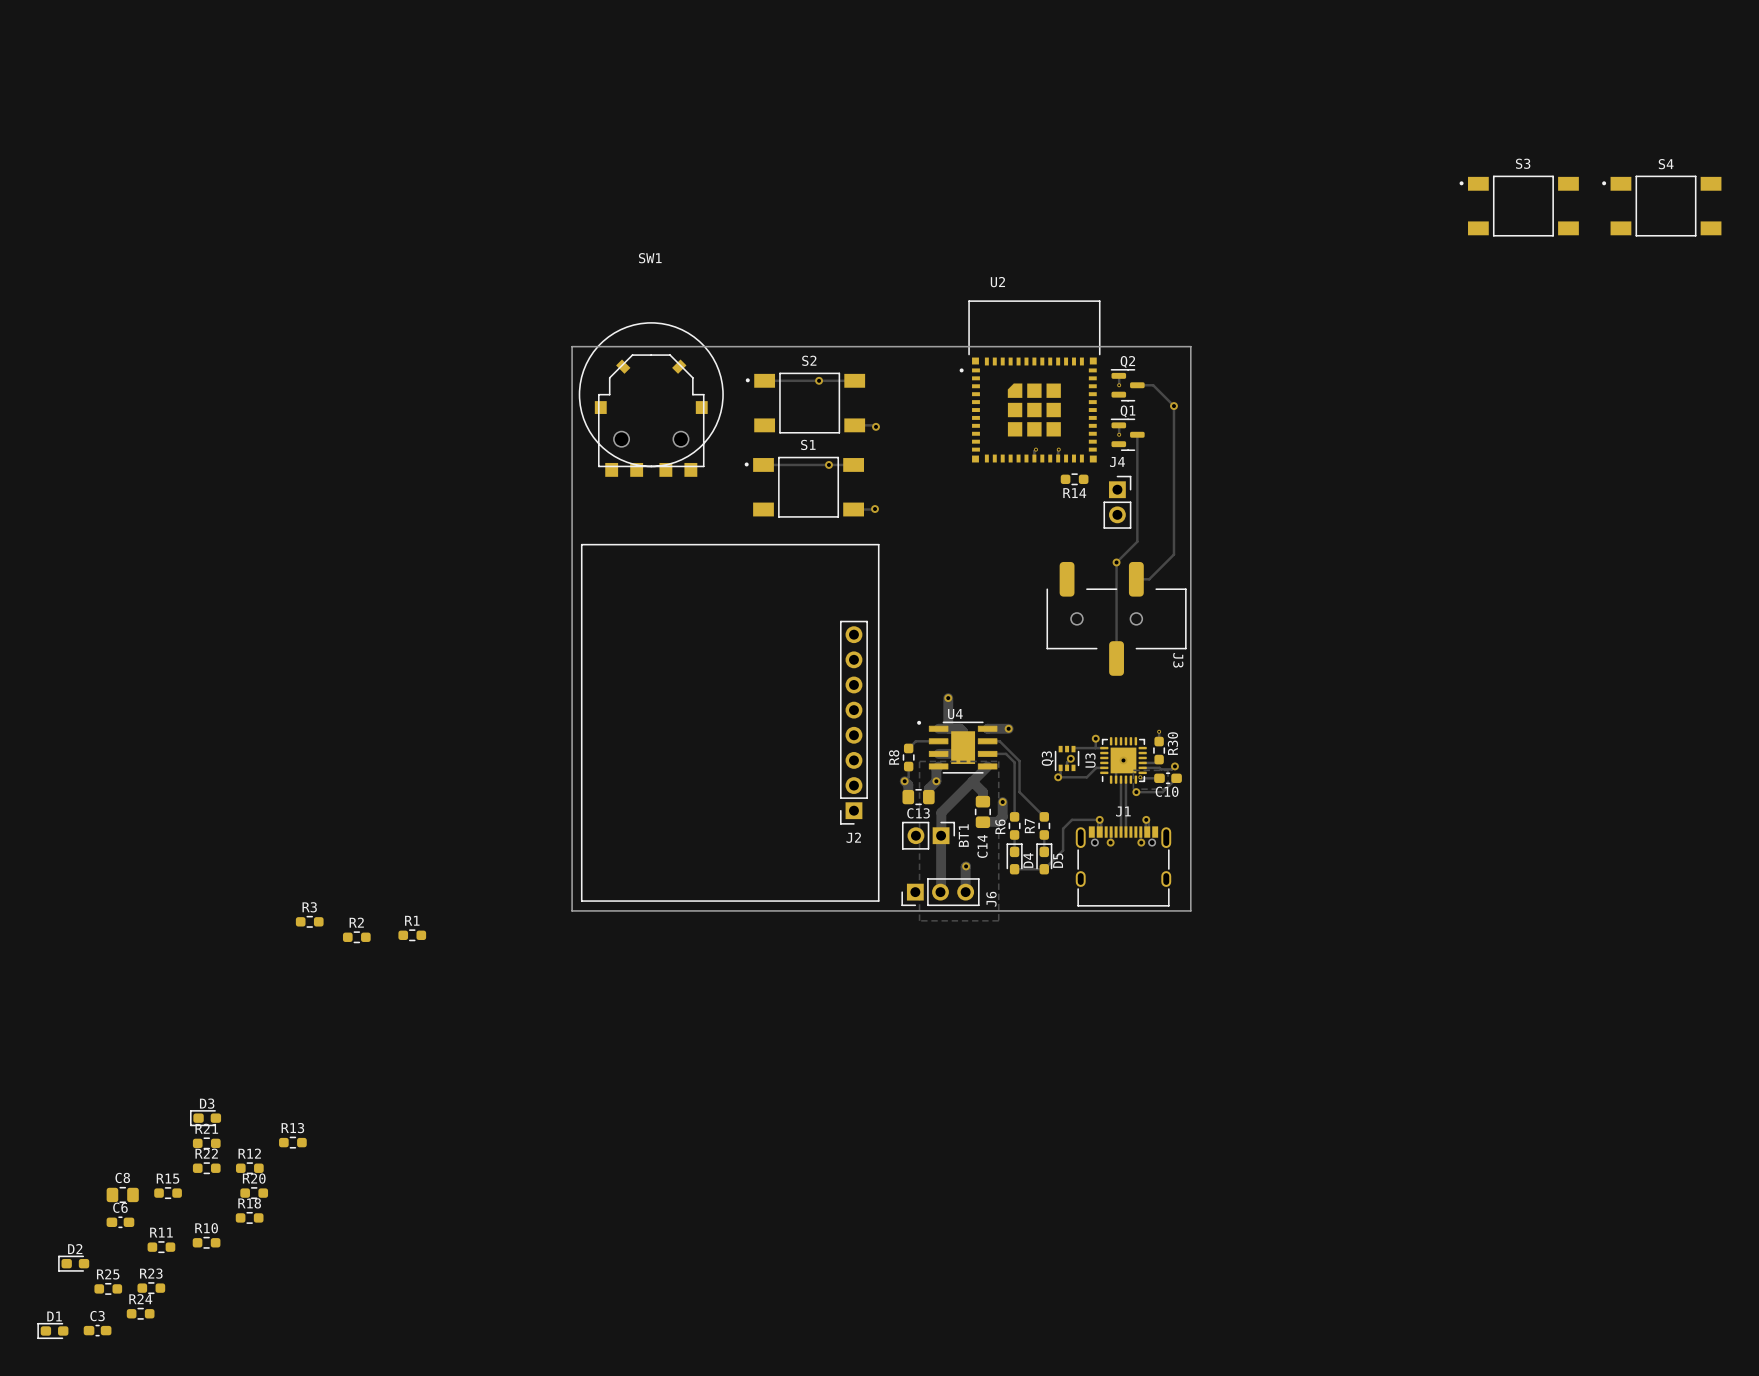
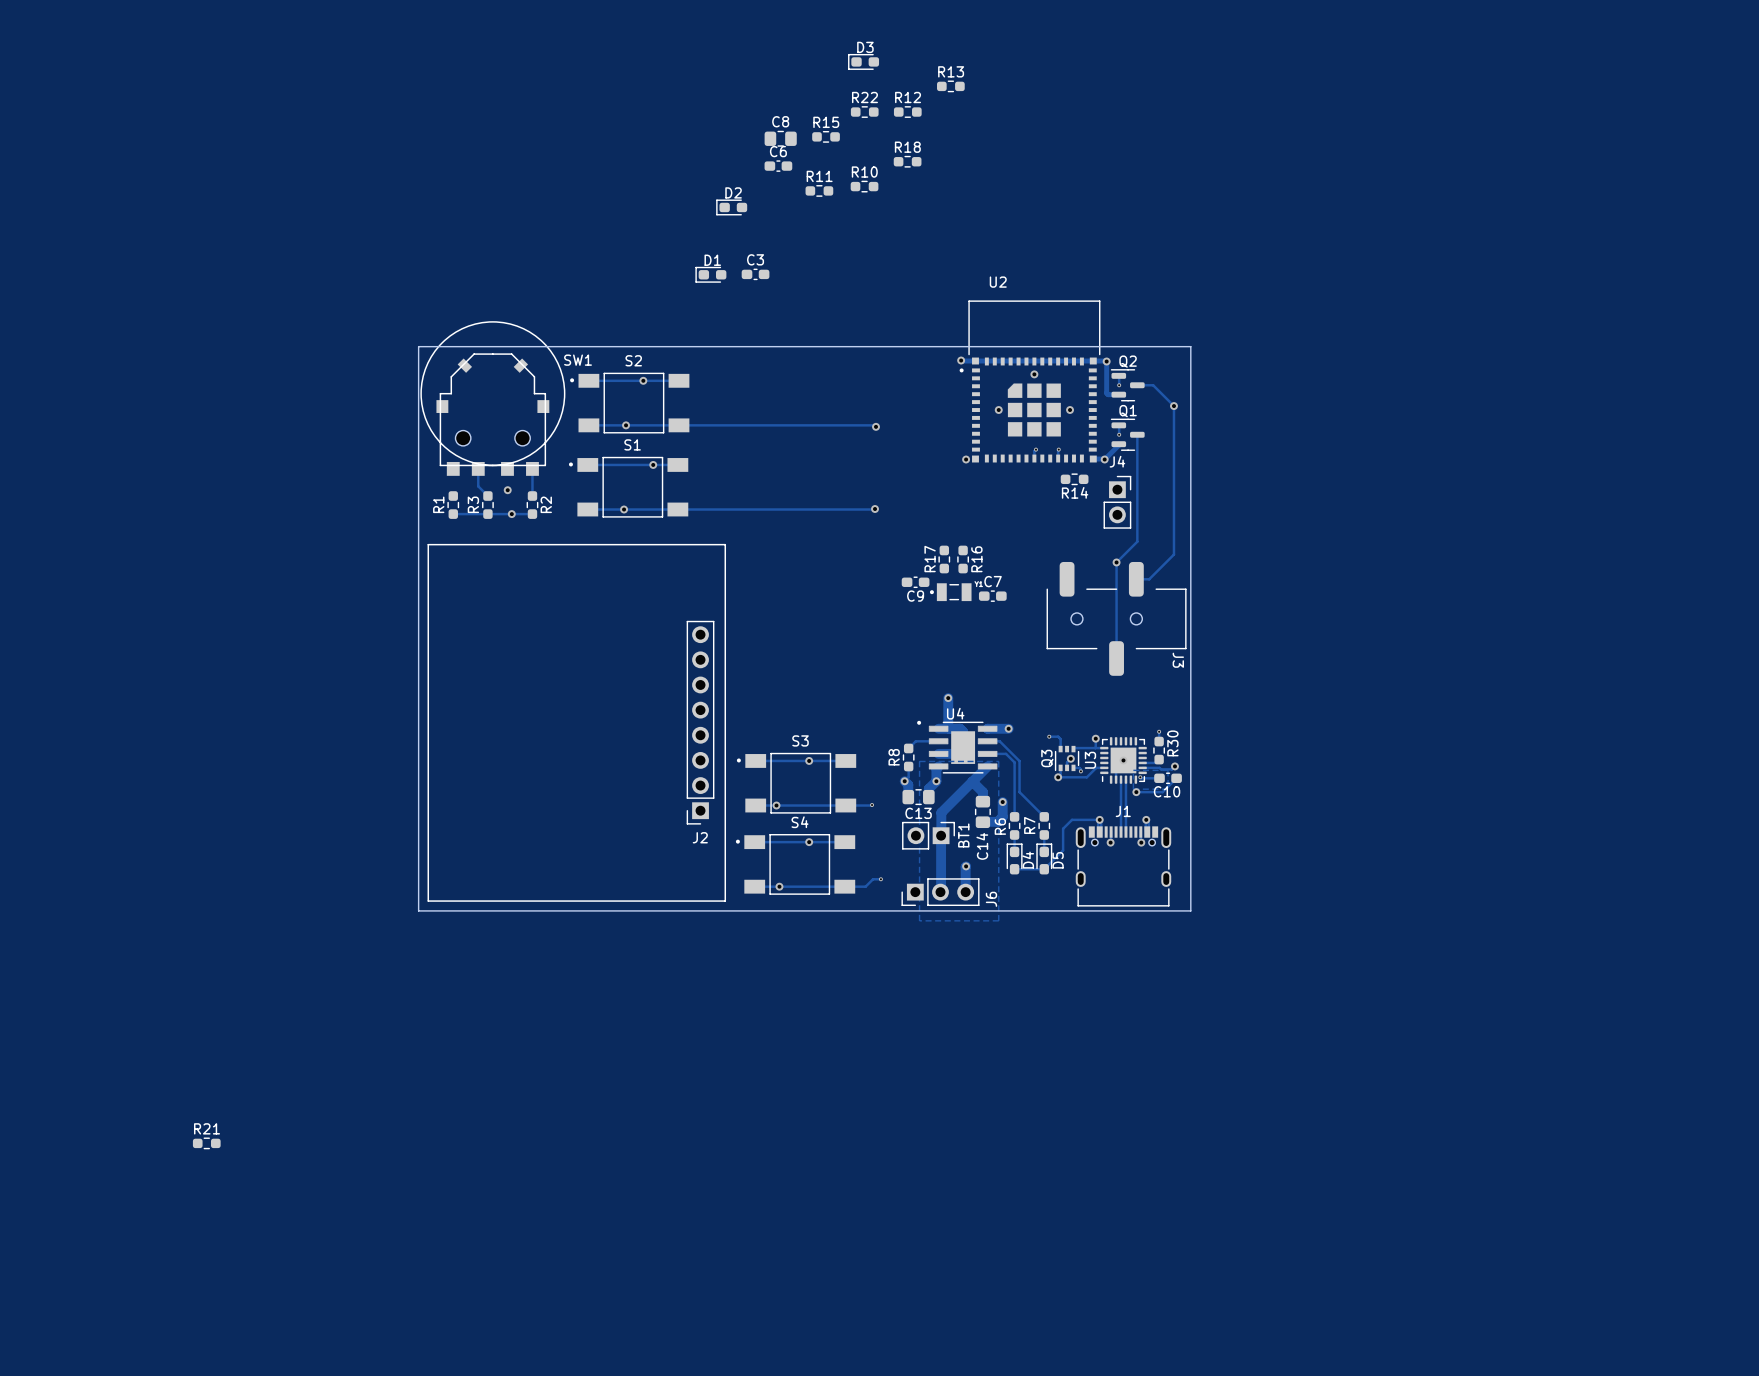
S3 position: (1519, 206) -> (796, 783)
S4 position: (1661, 206) -> (795, 864)
SW1 name position: SW1 (650, 258) -> SW1 (578, 360)
board edge: (572, 346) (572, 910) -> (572, 346) (418, 346) (418, 910) (572, 910)
track: none -> (961, 360) (1106, 361) (1106, 393) (1118, 394)
via: none -> (961, 360)
via: none -> (1106, 361)
via: none -> (1034, 374)
via: none -> (643, 380)
track: (764, 380) (854, 380) -> (588, 380) (678, 380)
via: (819, 380) -> none
SW1 position: (651, 399) -> (492, 398)
S2 position: (805, 403) -> (629, 403)
via: none -> (998, 410)
via: none -> (1070, 410)
track: none -> (588, 425) (854, 425)
via: none -> (626, 425)
track: none -> (1118, 444) (1104, 459) (1093, 459)
via: none -> (966, 459)
via: none -> (1104, 459)
via: none -> (653, 464)
track: (763, 464) (853, 464) -> (587, 464) (677, 464)
via: (828, 464) -> none
track: none -> (478, 468) (478, 486) (487, 496)
track: none -> (532, 468) (532, 496)
S1 position: (804, 487) -> (628, 487)
via: none -> (507, 490)
track: none -> (587, 509) (853, 509)
via: none -> (624, 509)
track: none -> (453, 514) (532, 514)
via: none -> (511, 514)
line: (581, 544) (581, 901) -> (581, 544) (428, 544) (428, 901) (581, 901)
line: (725, 544) (878, 544) (878, 901) (725, 901) -> (725, 544) (725, 901)
R17: none -> (944, 559)
R16: none -> (963, 559)
C9: none -> (915, 582)
part: none -> (950, 592)
C7: none -> (992, 596)
J2 position: (853, 722) -> (700, 722)
track: none -> (1049, 736) (1058, 736) (1060, 739) (1060, 749)
via: none -> (1049, 736)
track: none -> (755, 760) (845, 760)
via: none -> (809, 760)
track: none -> (1073, 767) (1079, 767) (1080, 771)
via: none -> (1080, 771)
via: none -> (776, 805)
track: none -> (872, 805) (755, 805)
via: none -> (872, 805)
track: none -> (754, 842) (844, 842)
via: none -> (809, 842)
track: none -> (880, 879) (873, 879) (865, 886) (754, 886)
via: none -> (880, 879)
via: none -> (779, 886)
R3 name position: R3 (309, 907) -> R3 (473, 504)
R1 name position: R1 (412, 920) -> R1 (438, 504)
R3 rotation: 0° (309, 921) -> 90° clockwise (487, 505)
R3 position: (309, 921) -> (487, 505)
R1 rotation: 0° (412, 935) -> 90° clockwise (453, 505)
R1 position: (412, 935) -> (453, 505)
R2 rotation: 0° (356, 937) -> 90° clockwise (532, 505)
R2 position: (356, 937) -> (532, 505)
D3 position: (205, 1118) -> (863, 61)
R13 position: (292, 1142) -> (950, 86)
R22 position: (206, 1168) -> (864, 112)
R12 position: (249, 1168) -> (907, 112)
R15 position: (168, 1193) -> (826, 136)
R20: (254, 1193) -> none
C8 position: (122, 1194) -> (780, 138)
R18 position: (249, 1217) -> (907, 161)
C6 position: (120, 1222) -> (778, 166)
R10 position: (206, 1242) -> (864, 186)
R11 position: (161, 1247) -> (819, 190)
D2 position: (73, 1263) -> (731, 207)
R25: (108, 1288) -> none
R23: (151, 1288) -> none
R24: (140, 1313) -> none
D1 position: (52, 1330) -> (710, 274)
C3 position: (97, 1330) -> (755, 274)

